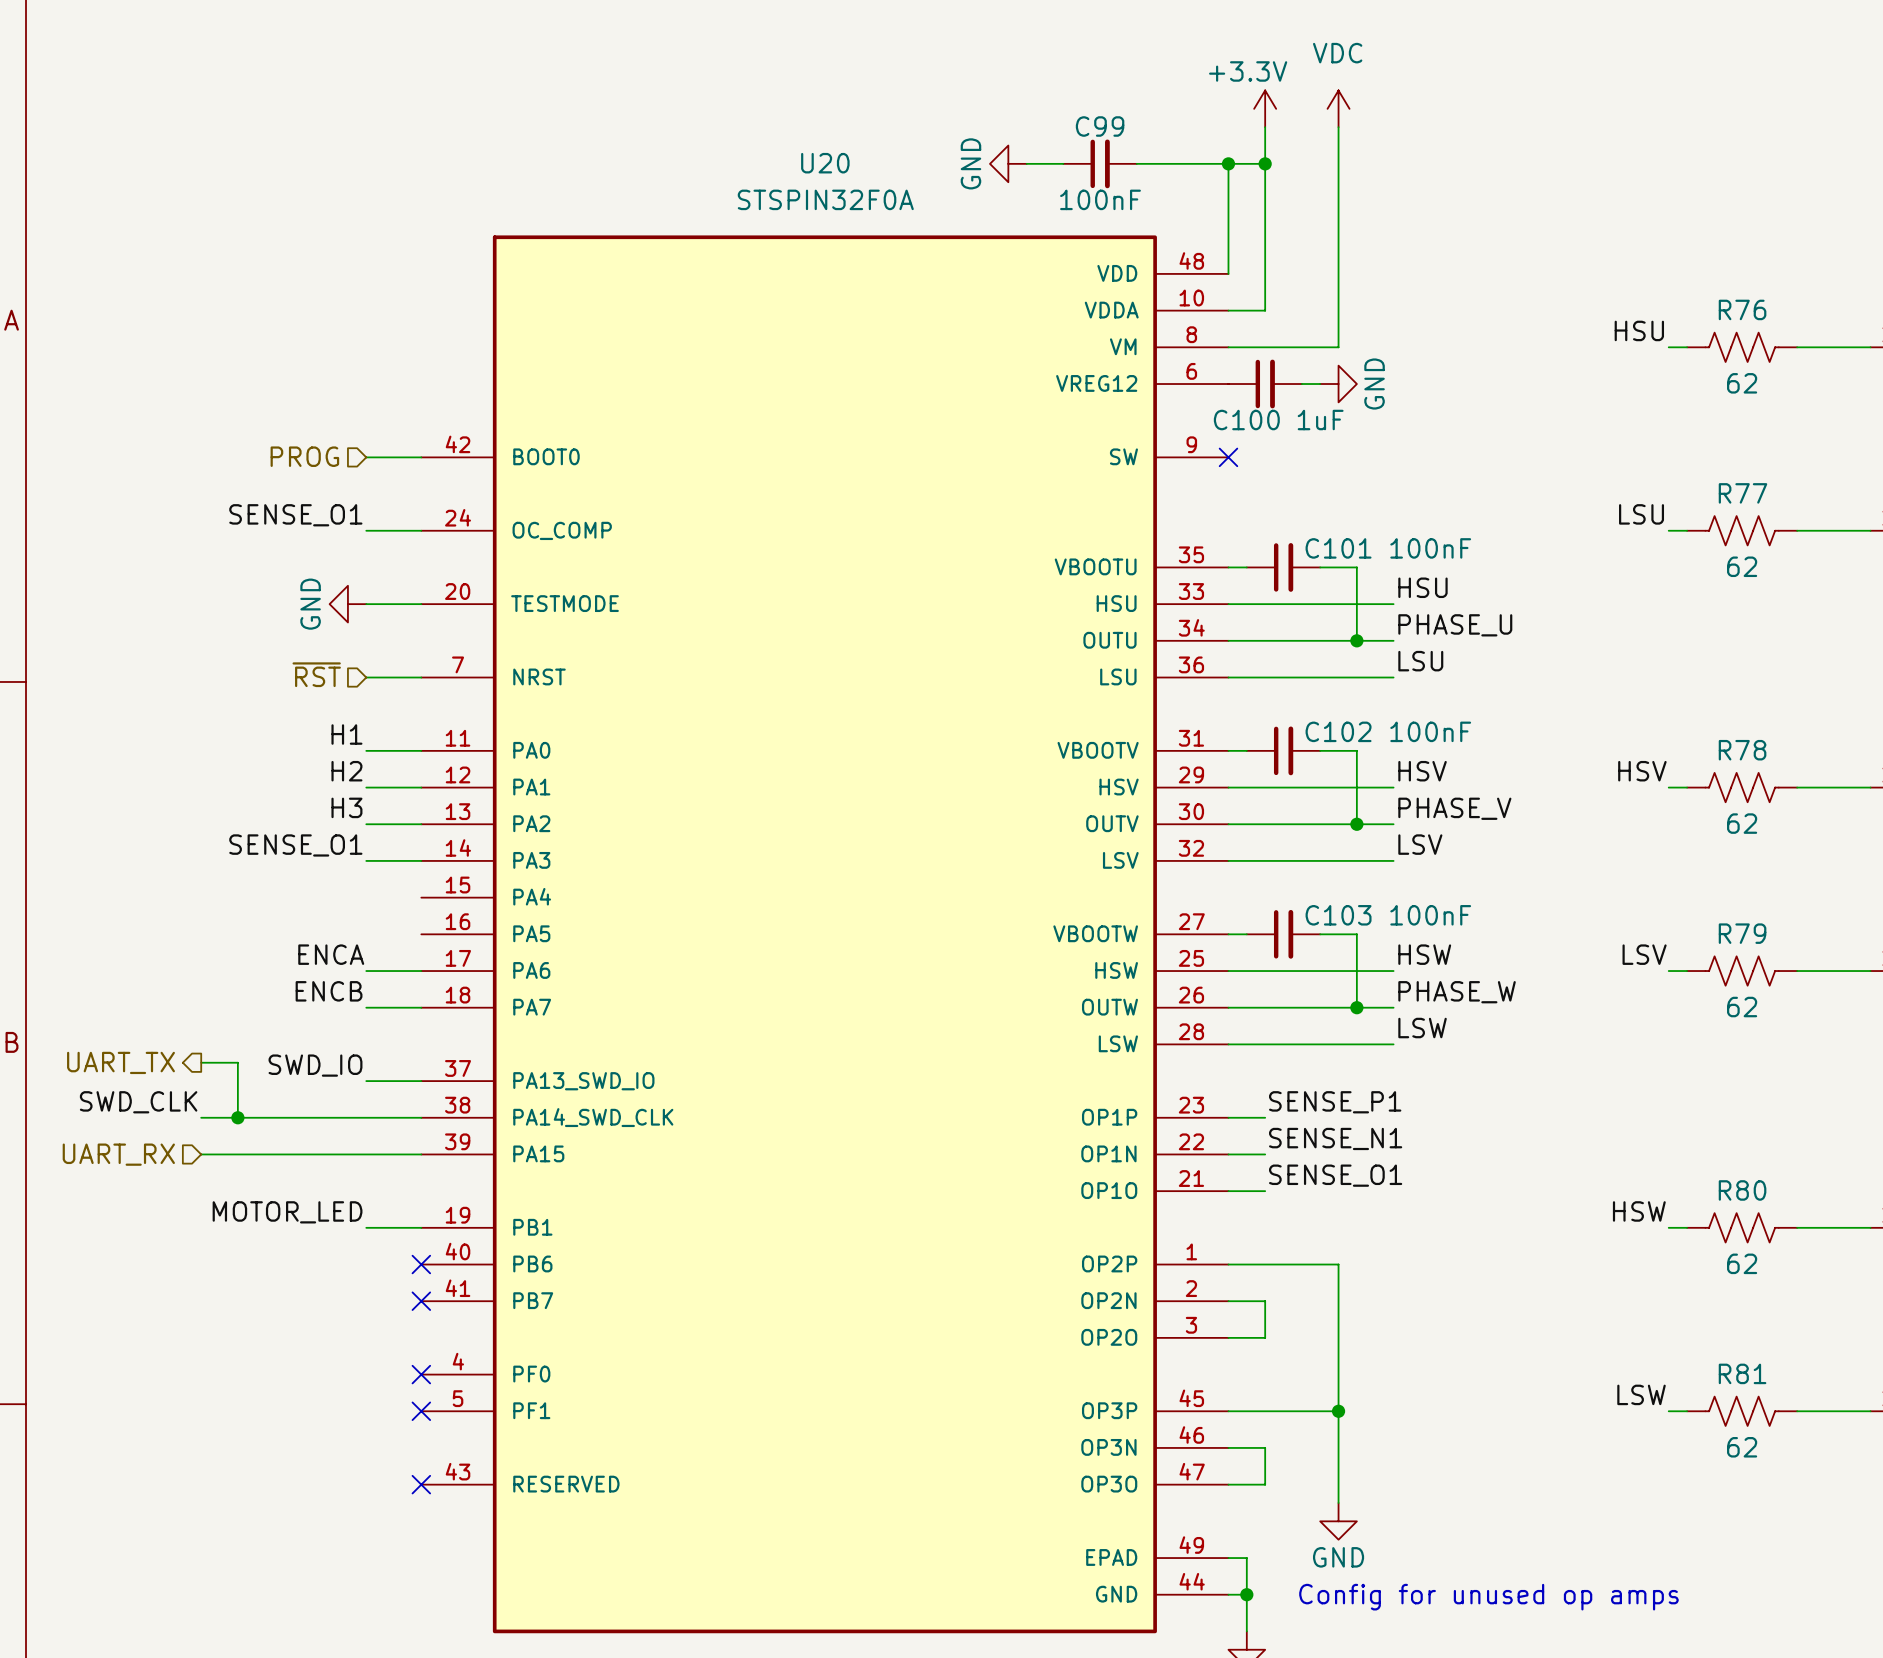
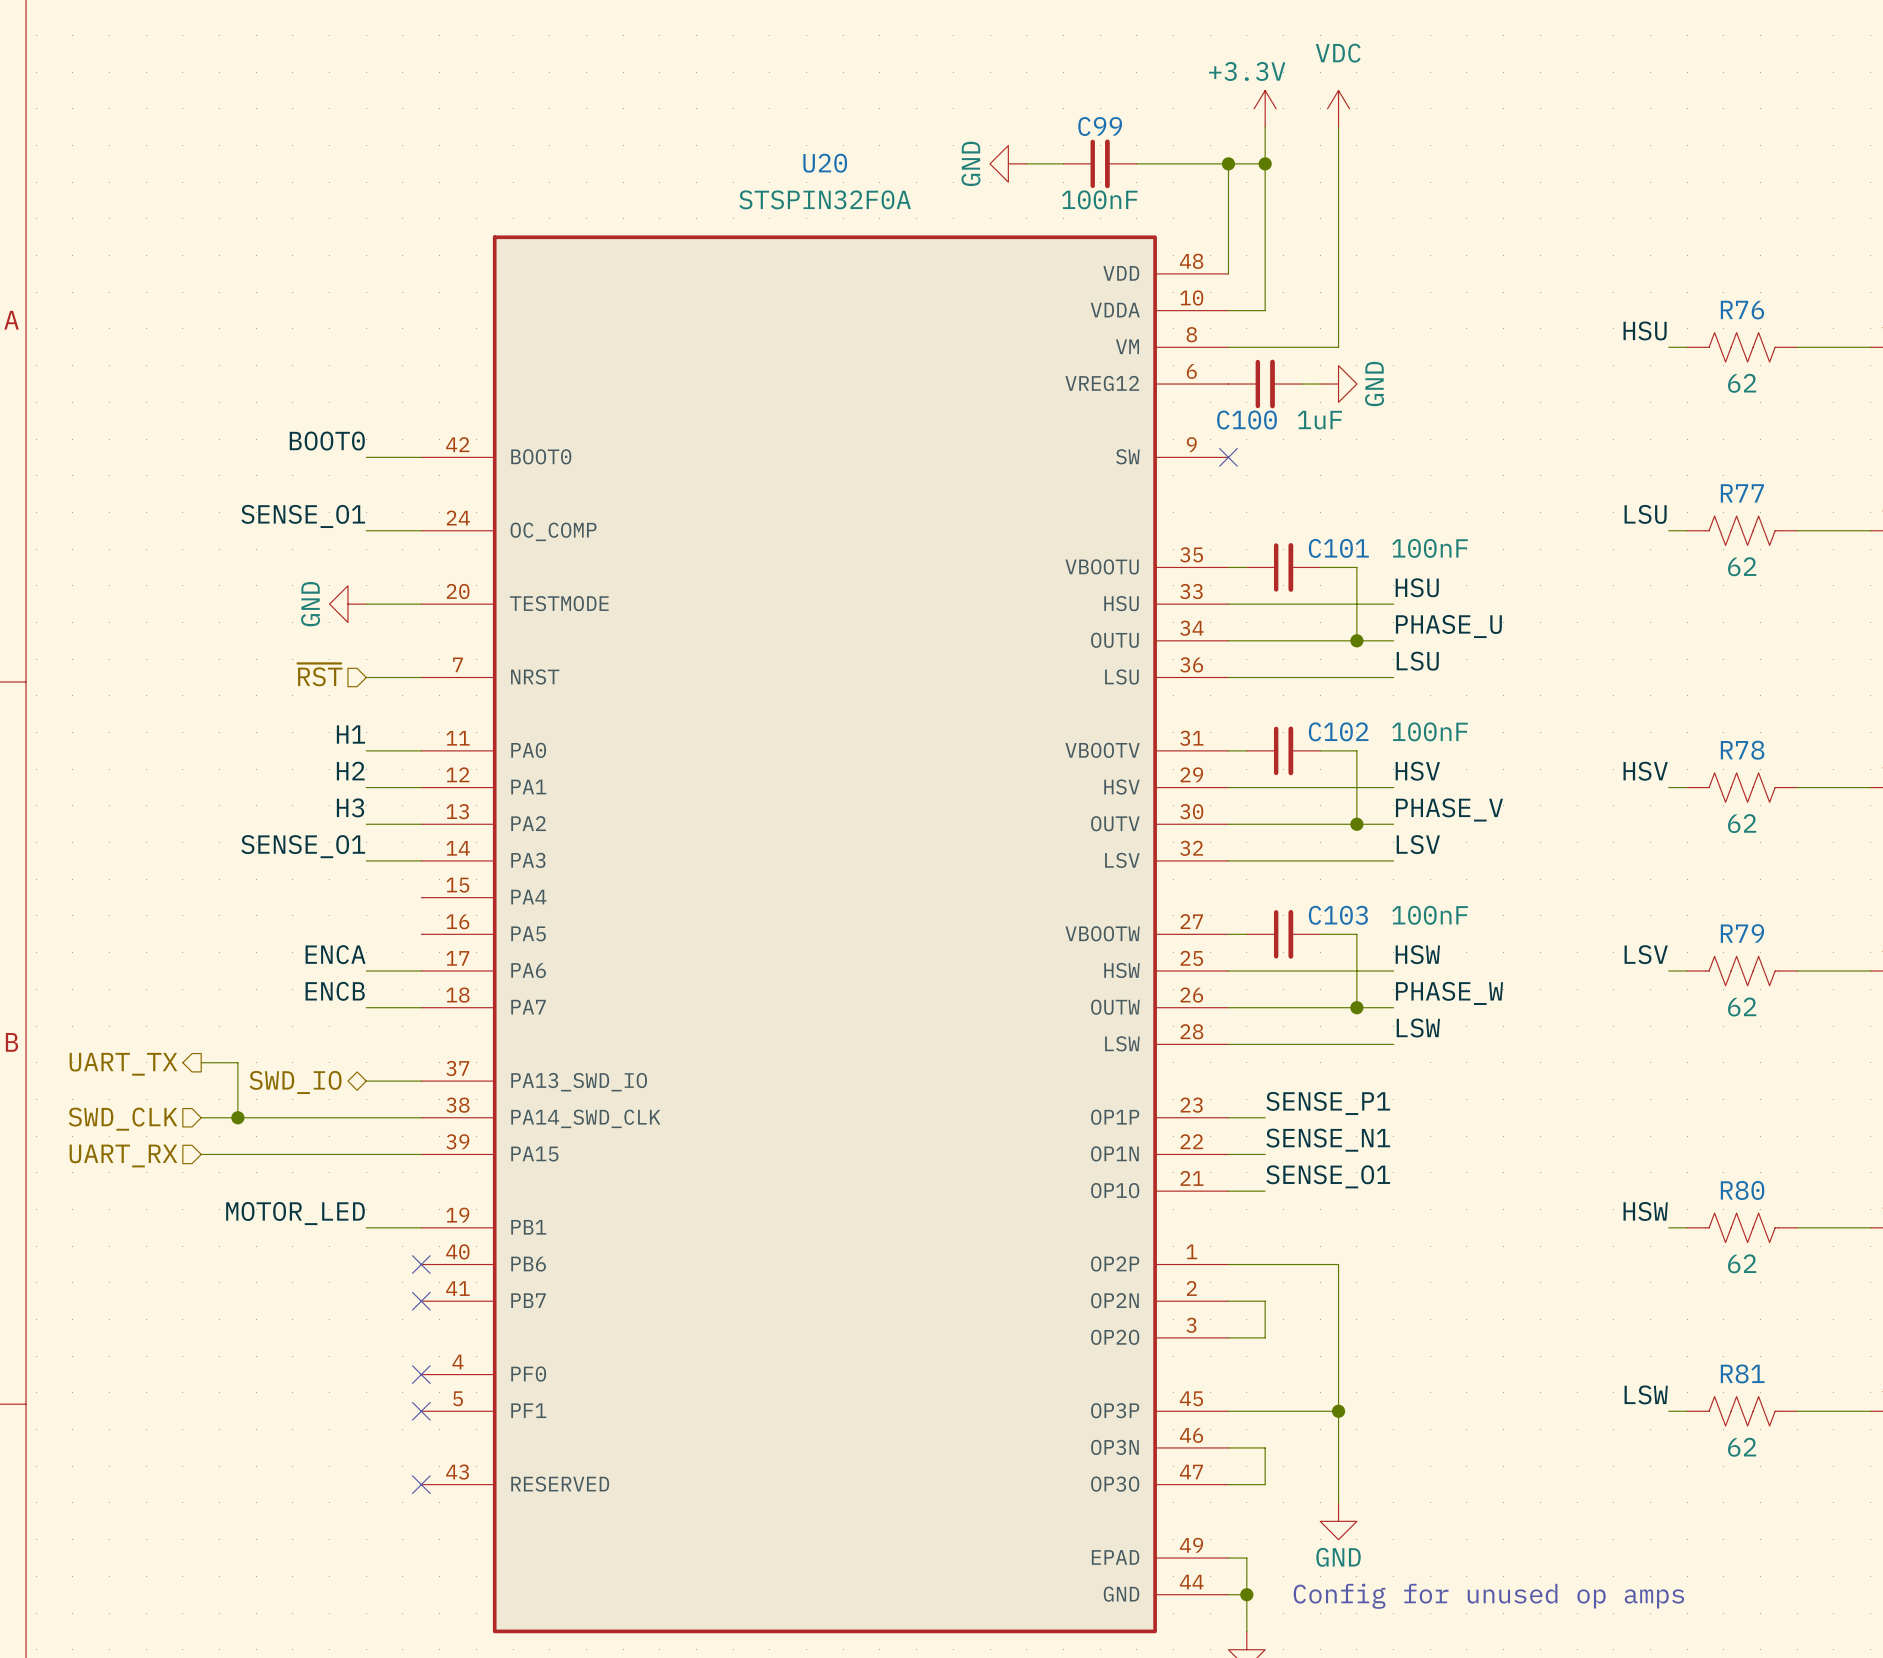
label: none -> BOOT0 (327, 441)
hierarchical label: PROG (304, 456) -> none
label: SWD_IO (315, 1065) -> none
hierarchical label: none -> SWD_IO (295, 1082)
label: SWD_CLK (138, 1102) -> none
hierarchical label: none -> SWD_CLK (123, 1119)

